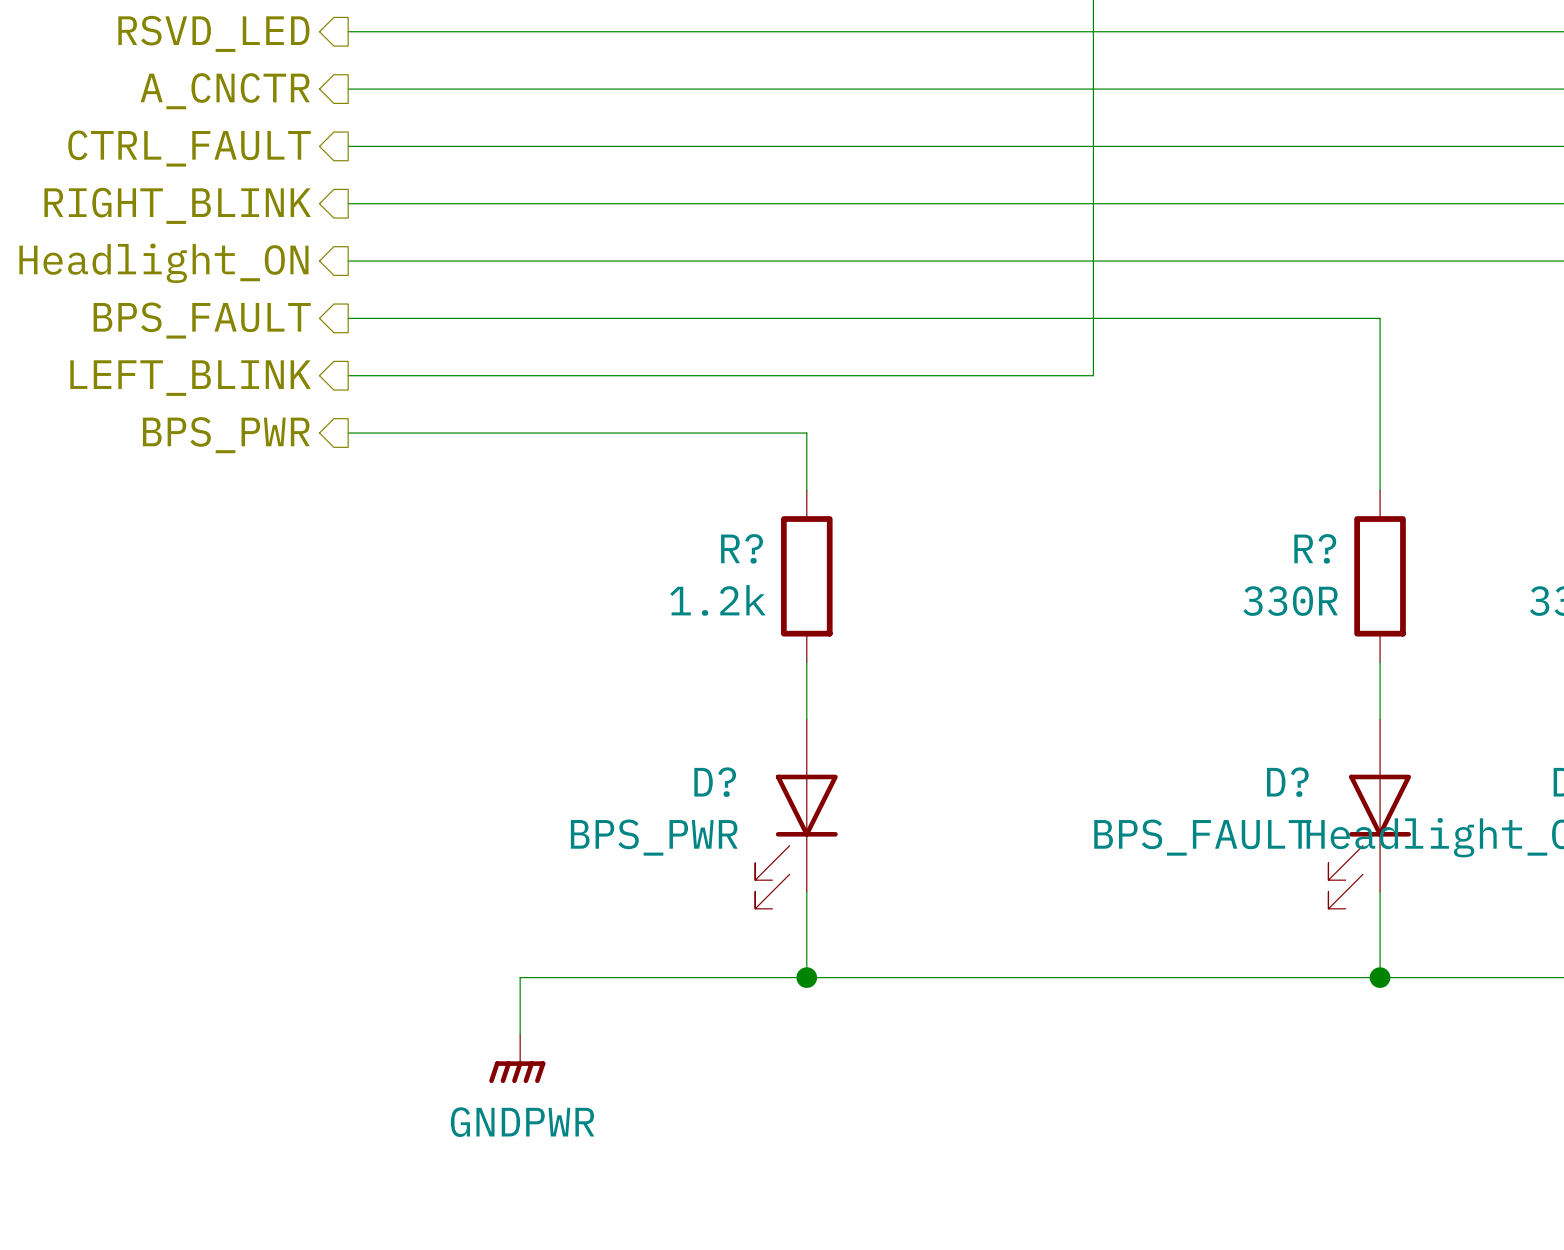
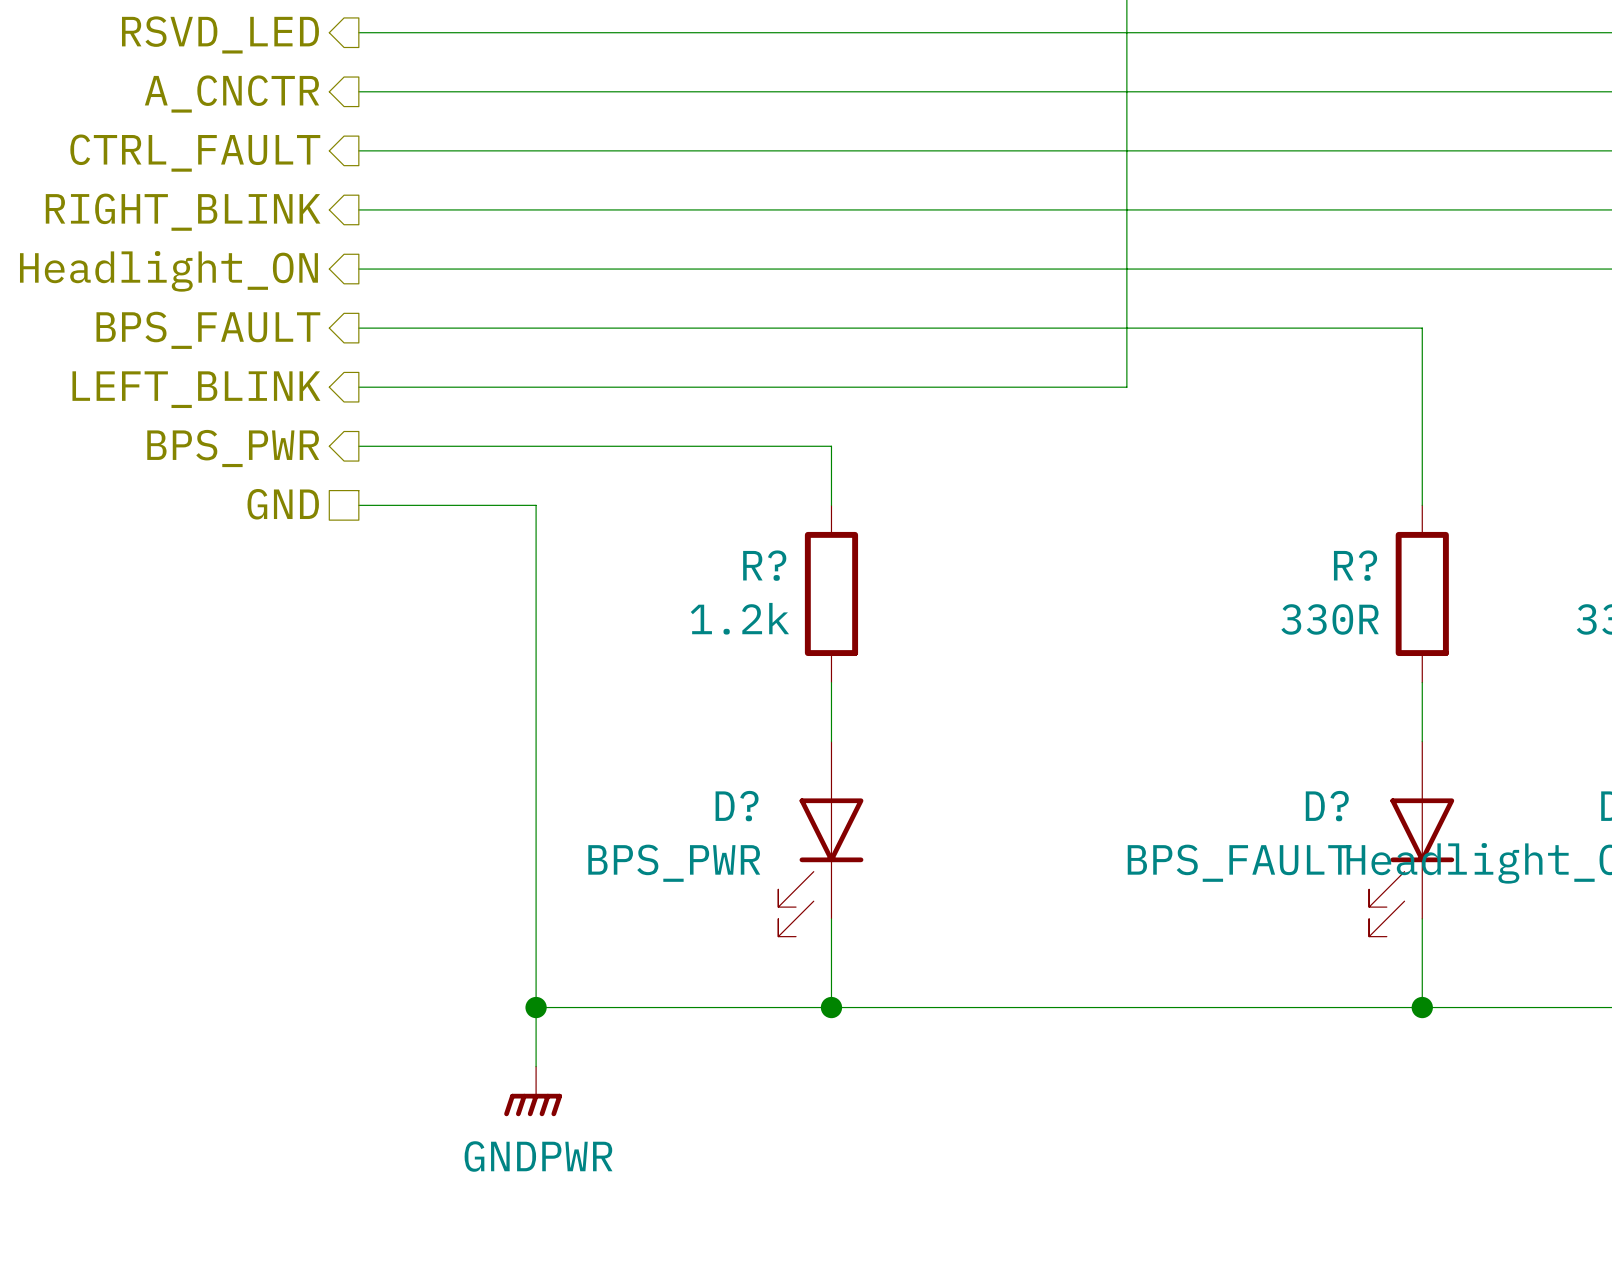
hierarchical label: none -> GND (283, 504)
wire: none -> (358, 505) (536, 505) (536, 1007)
junction: none -> (536, 1007)

